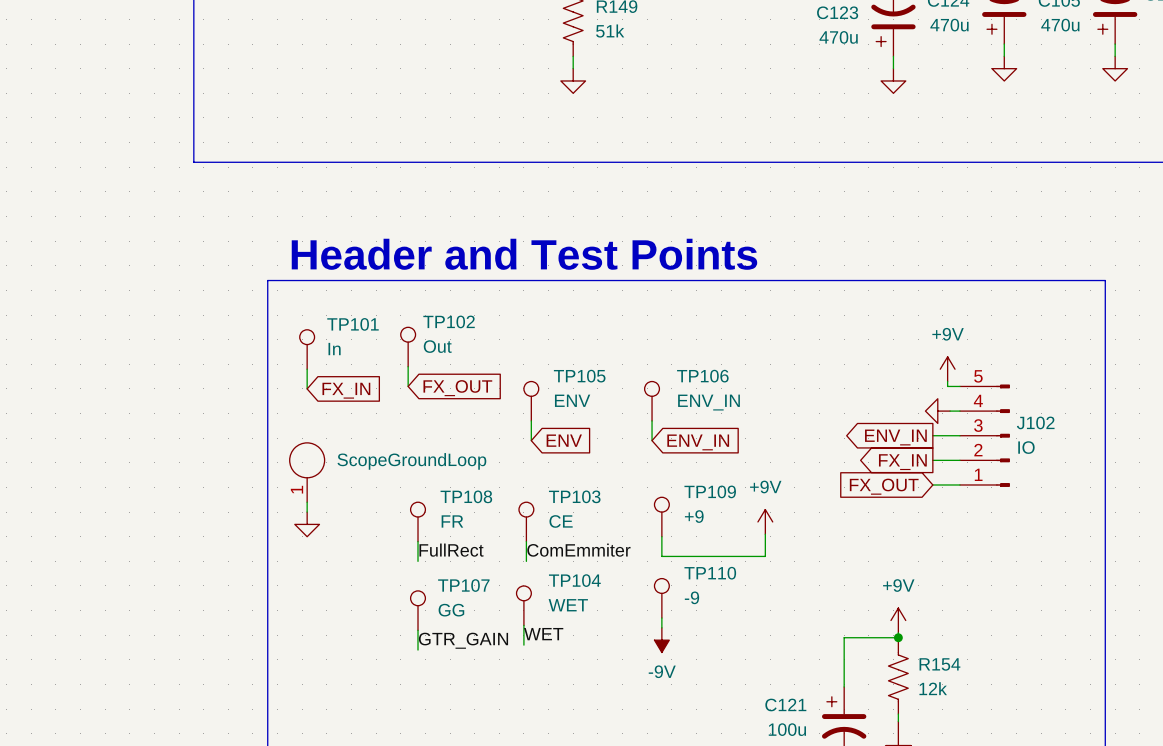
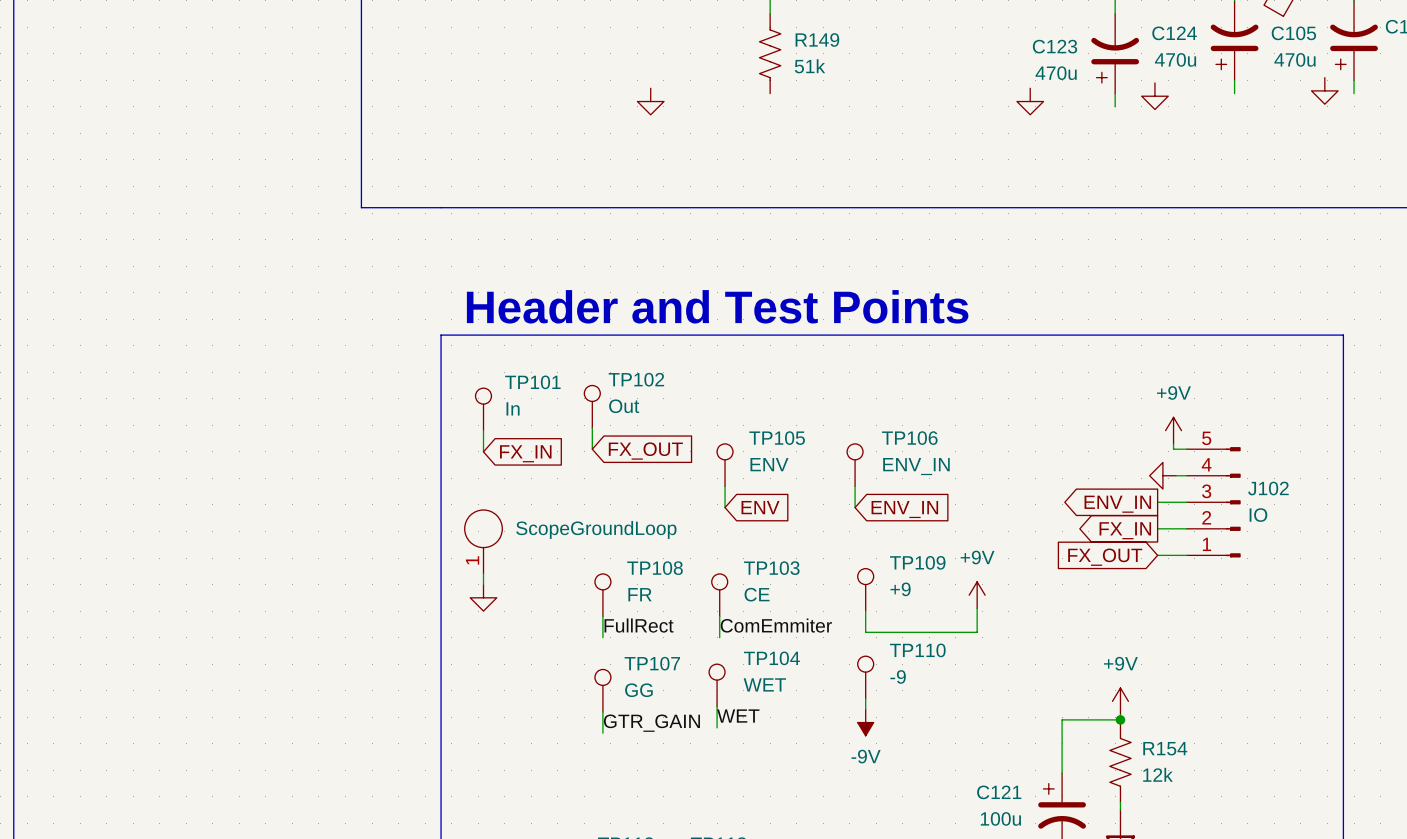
wire: (573, 56) (573, 68) -> none
power symbol: none -> (1154, 96)
power symbol: none -> (650, 101)
power symbol: none -> (1030, 101)
power symbol: (1004, 68) -> none
power symbol position: (1115, 68) -> (1324, 90)
power symbol: (573, 80) -> none
power symbol: (893, 80) -> none

